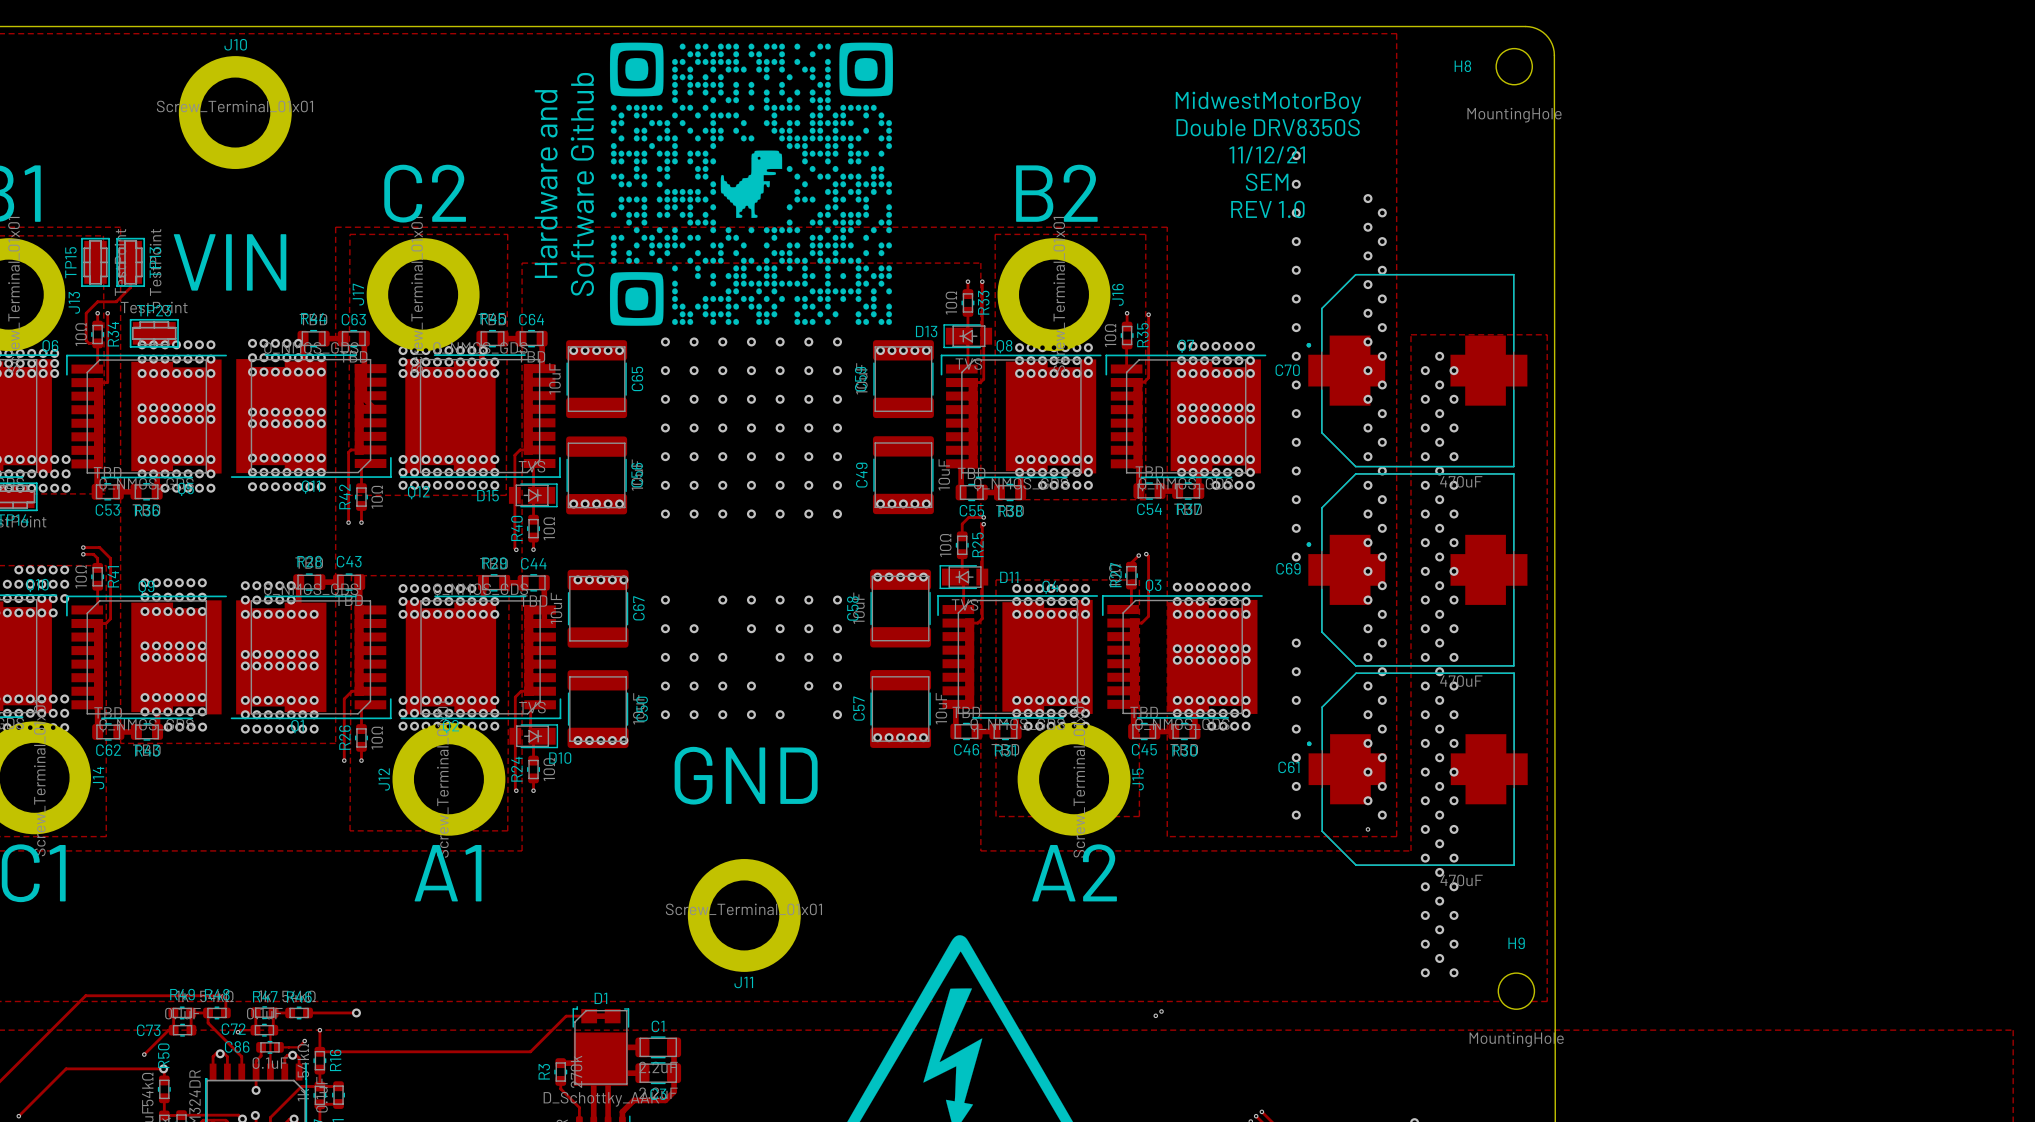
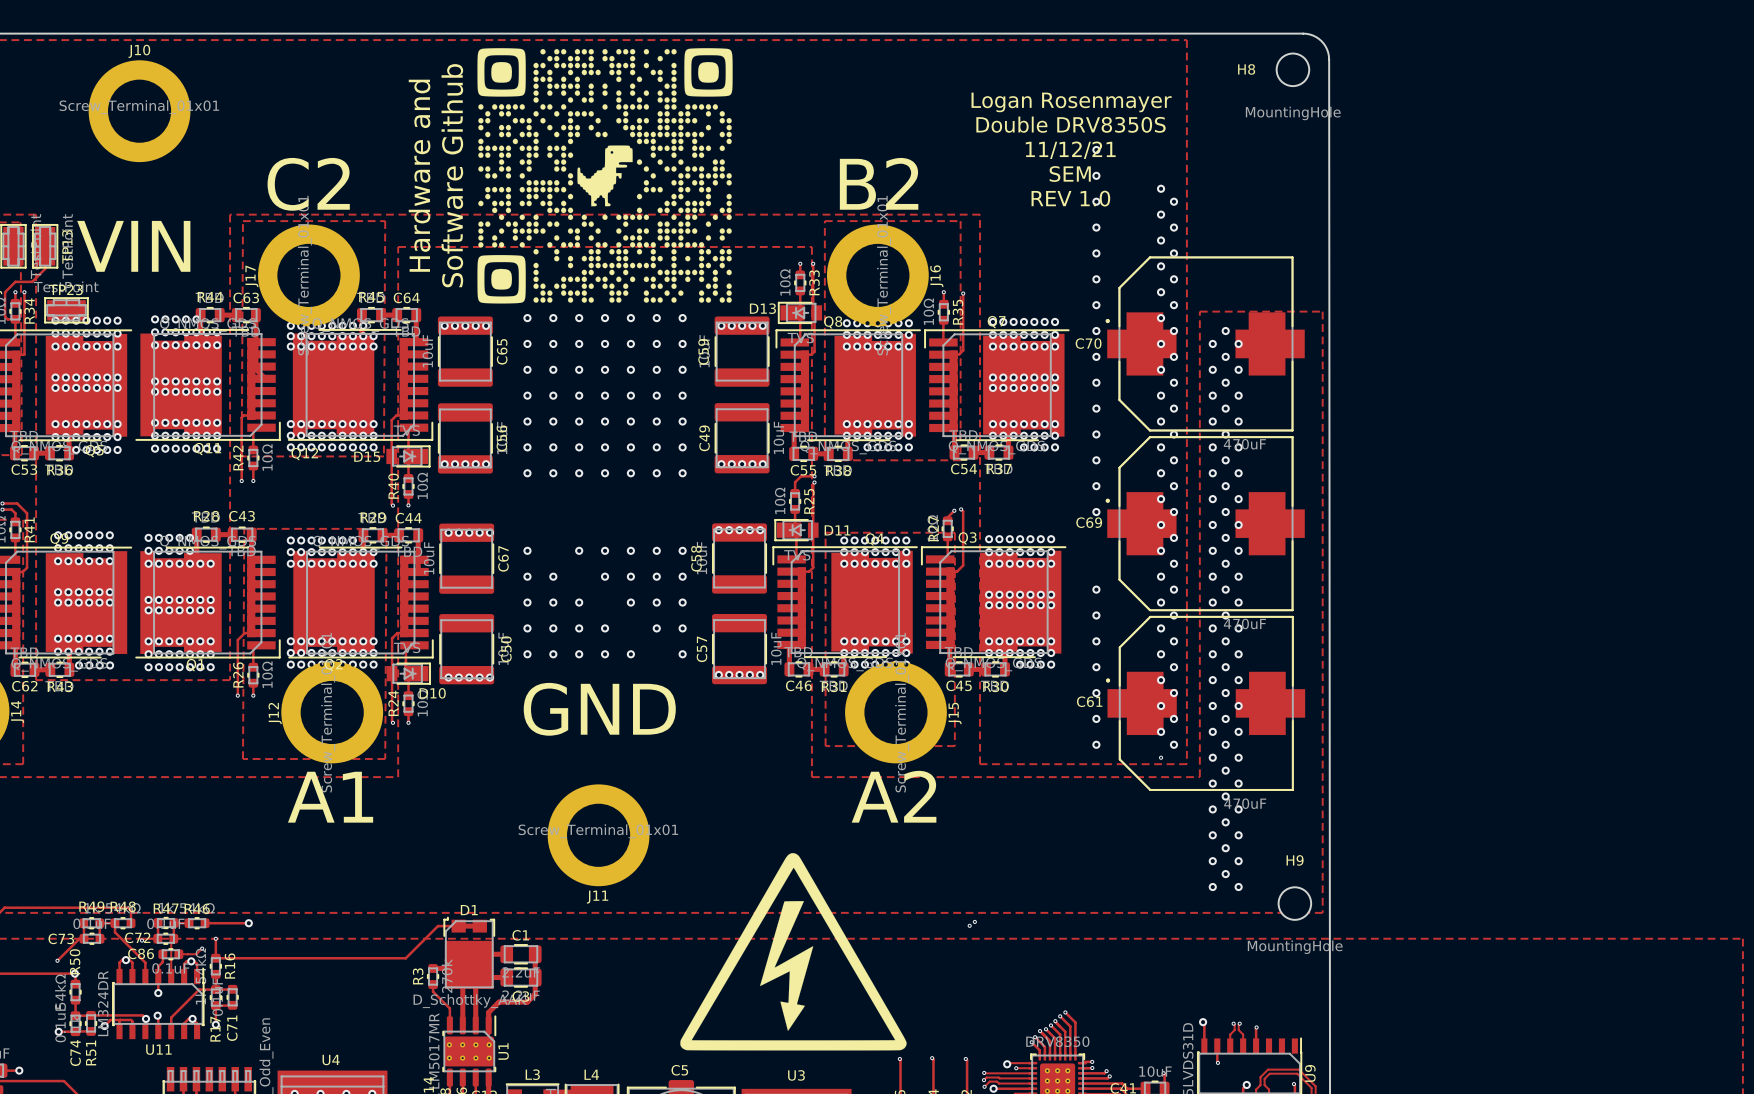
text: MidwestMotorBoy (1268, 102) -> Logan Rosenmayer (1071, 102)

